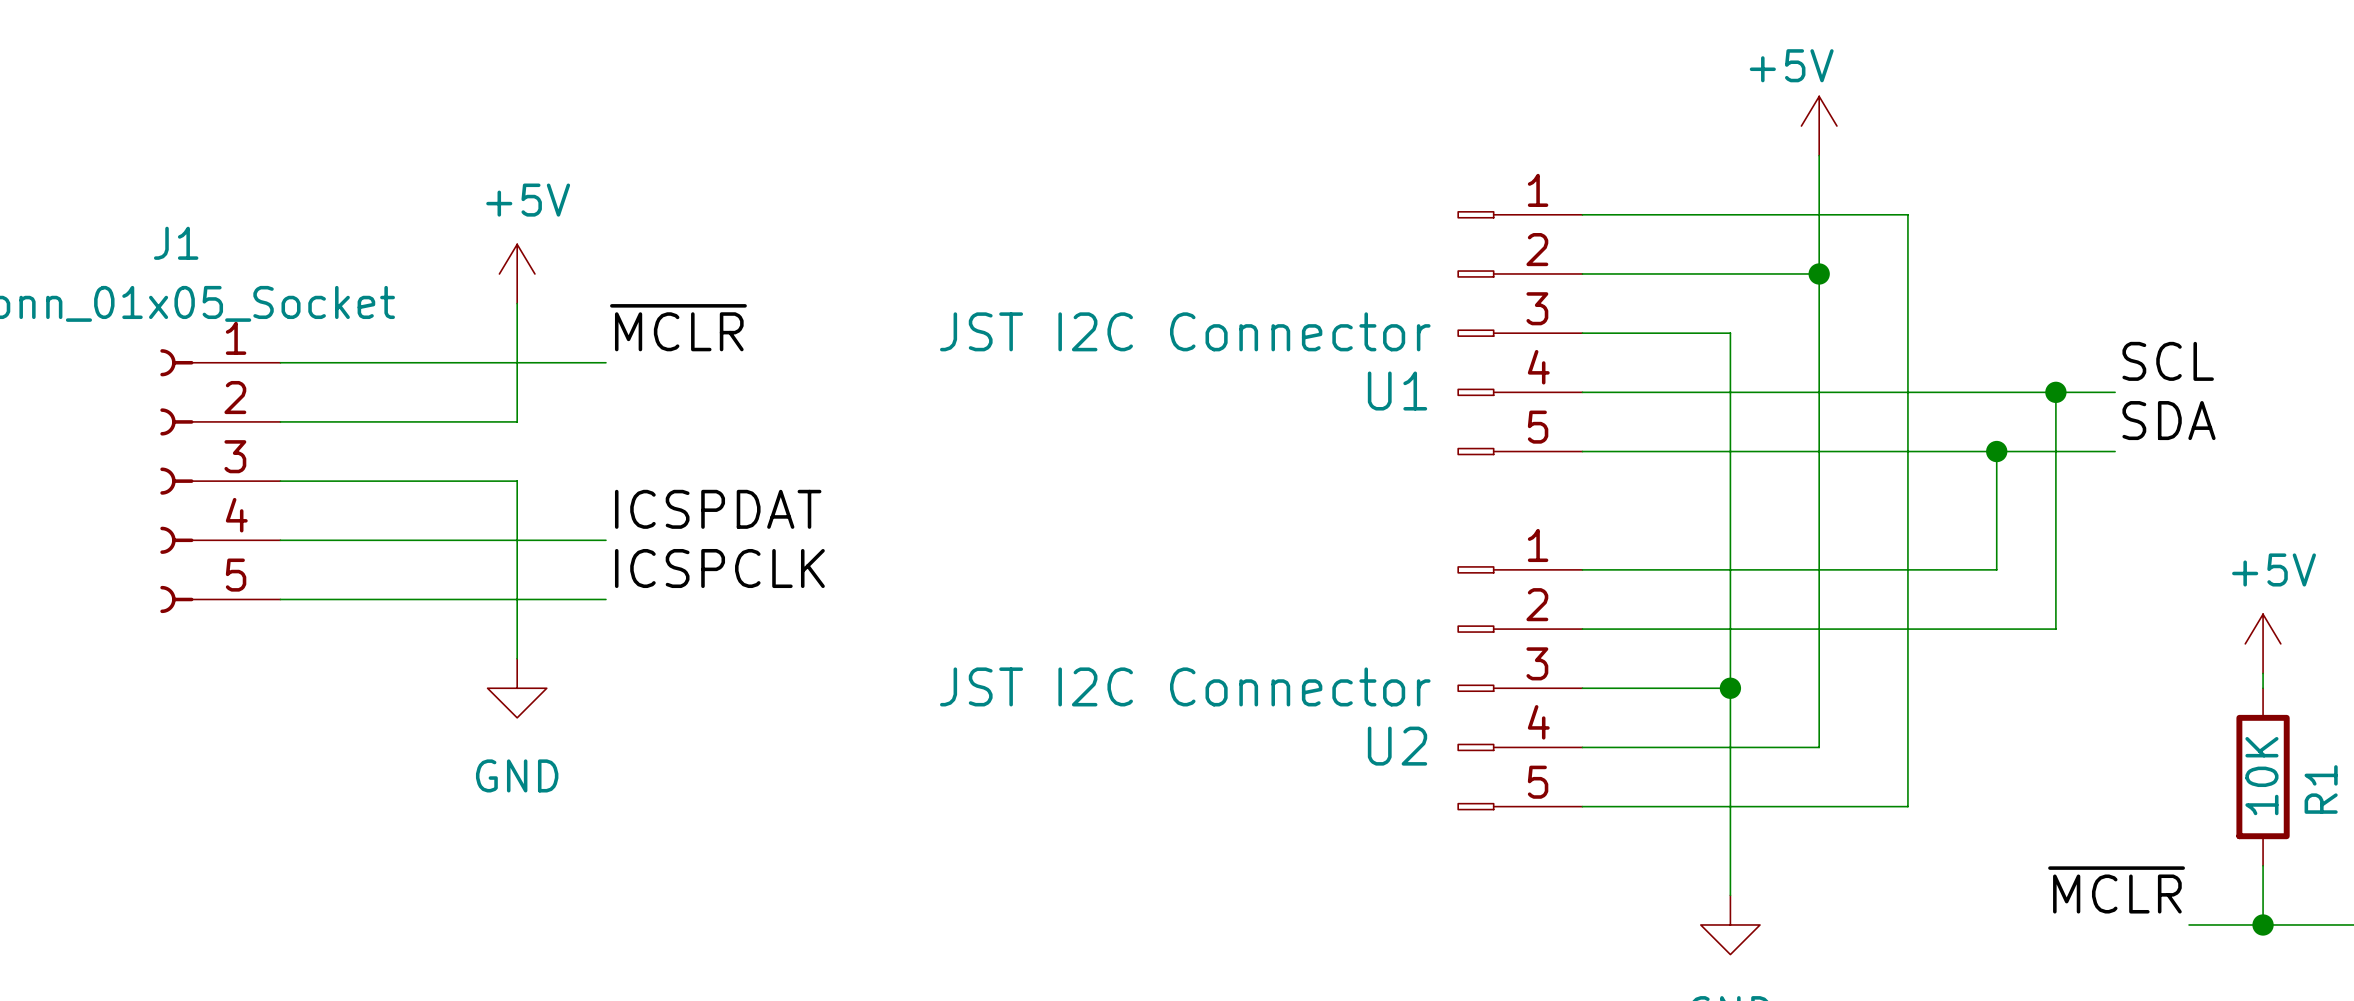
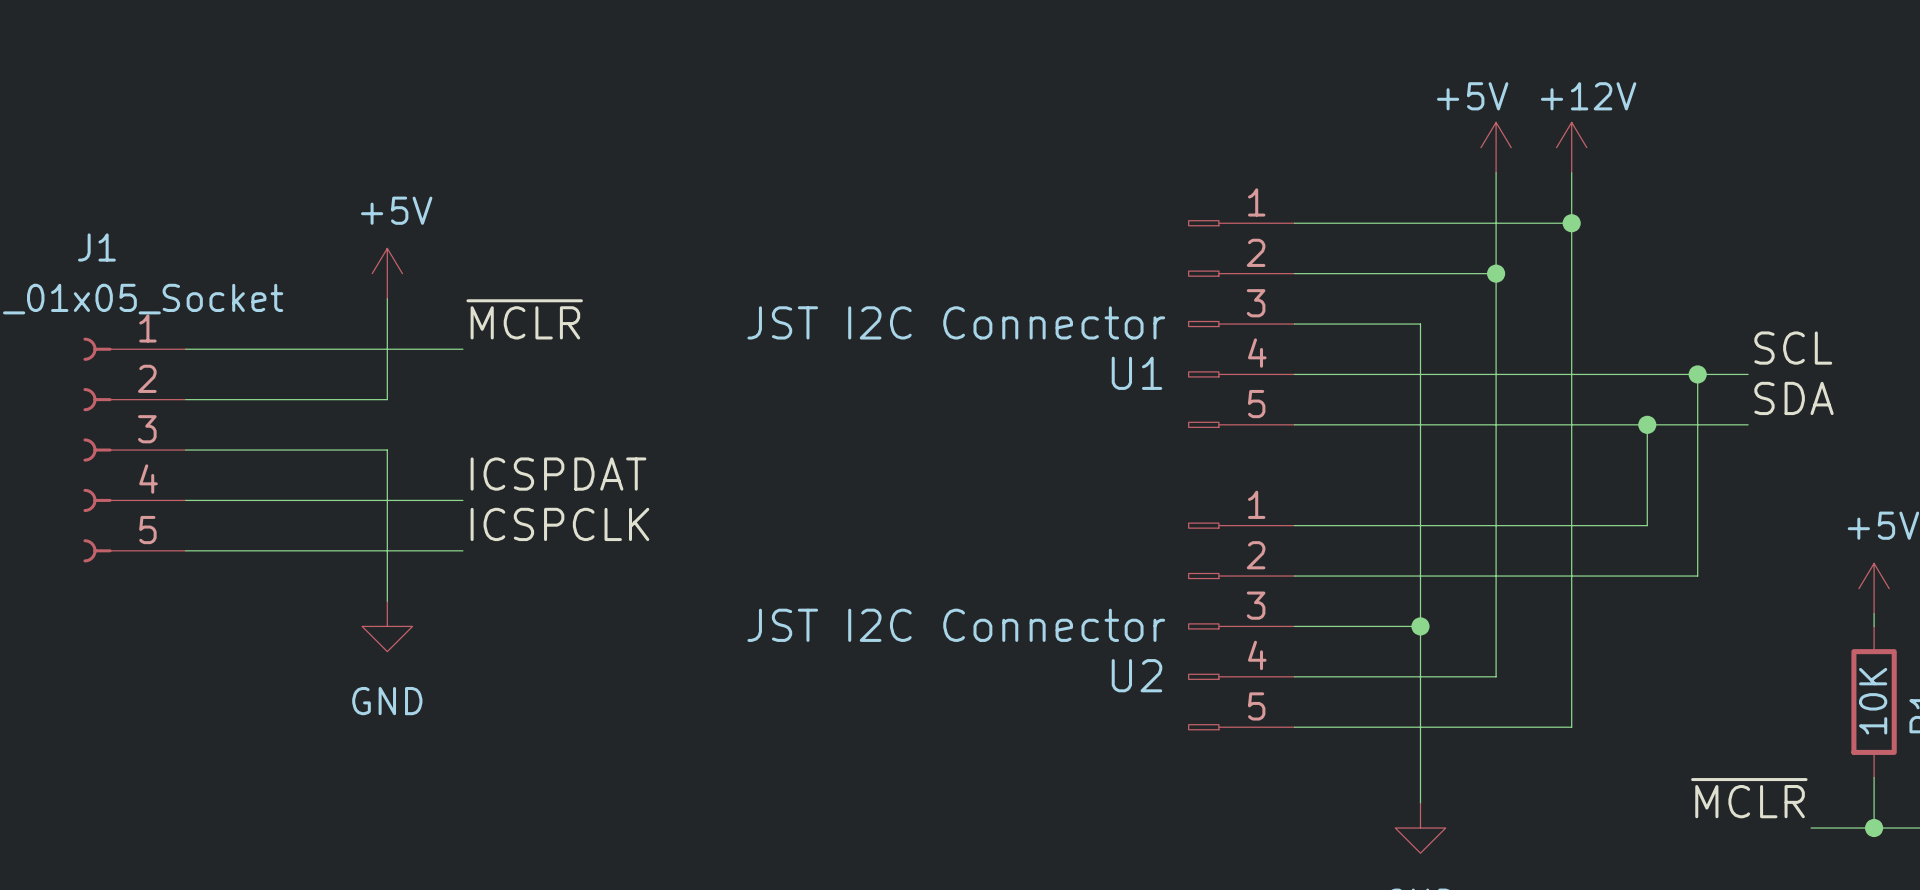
power symbol: none -> +12V (1571, 147)
wire: none -> (1571, 172) (1571, 223)
junction: none -> (1571, 223)

